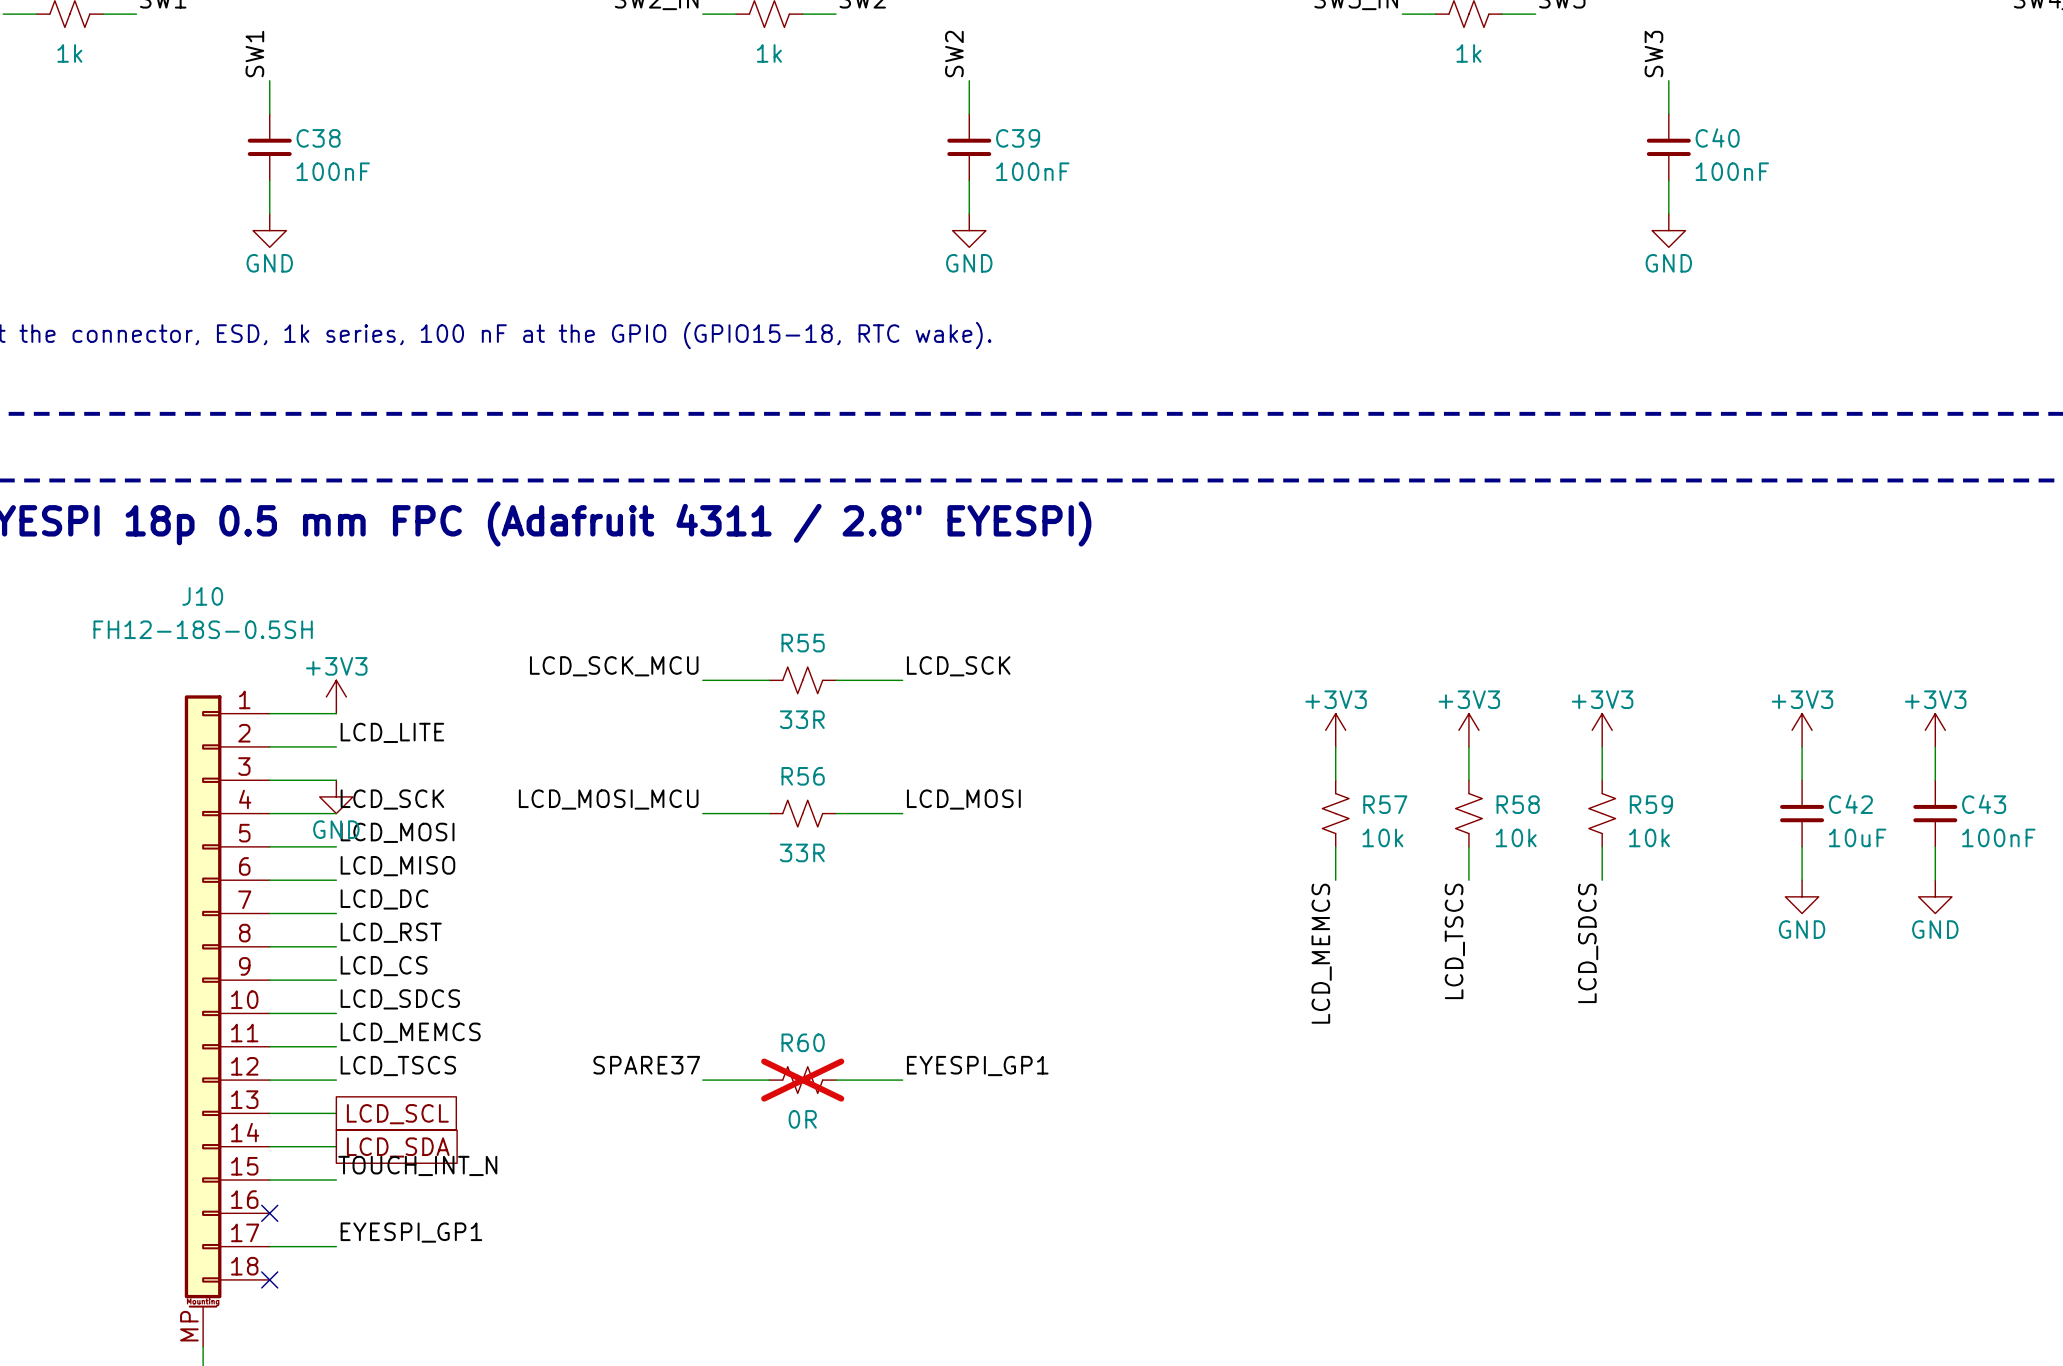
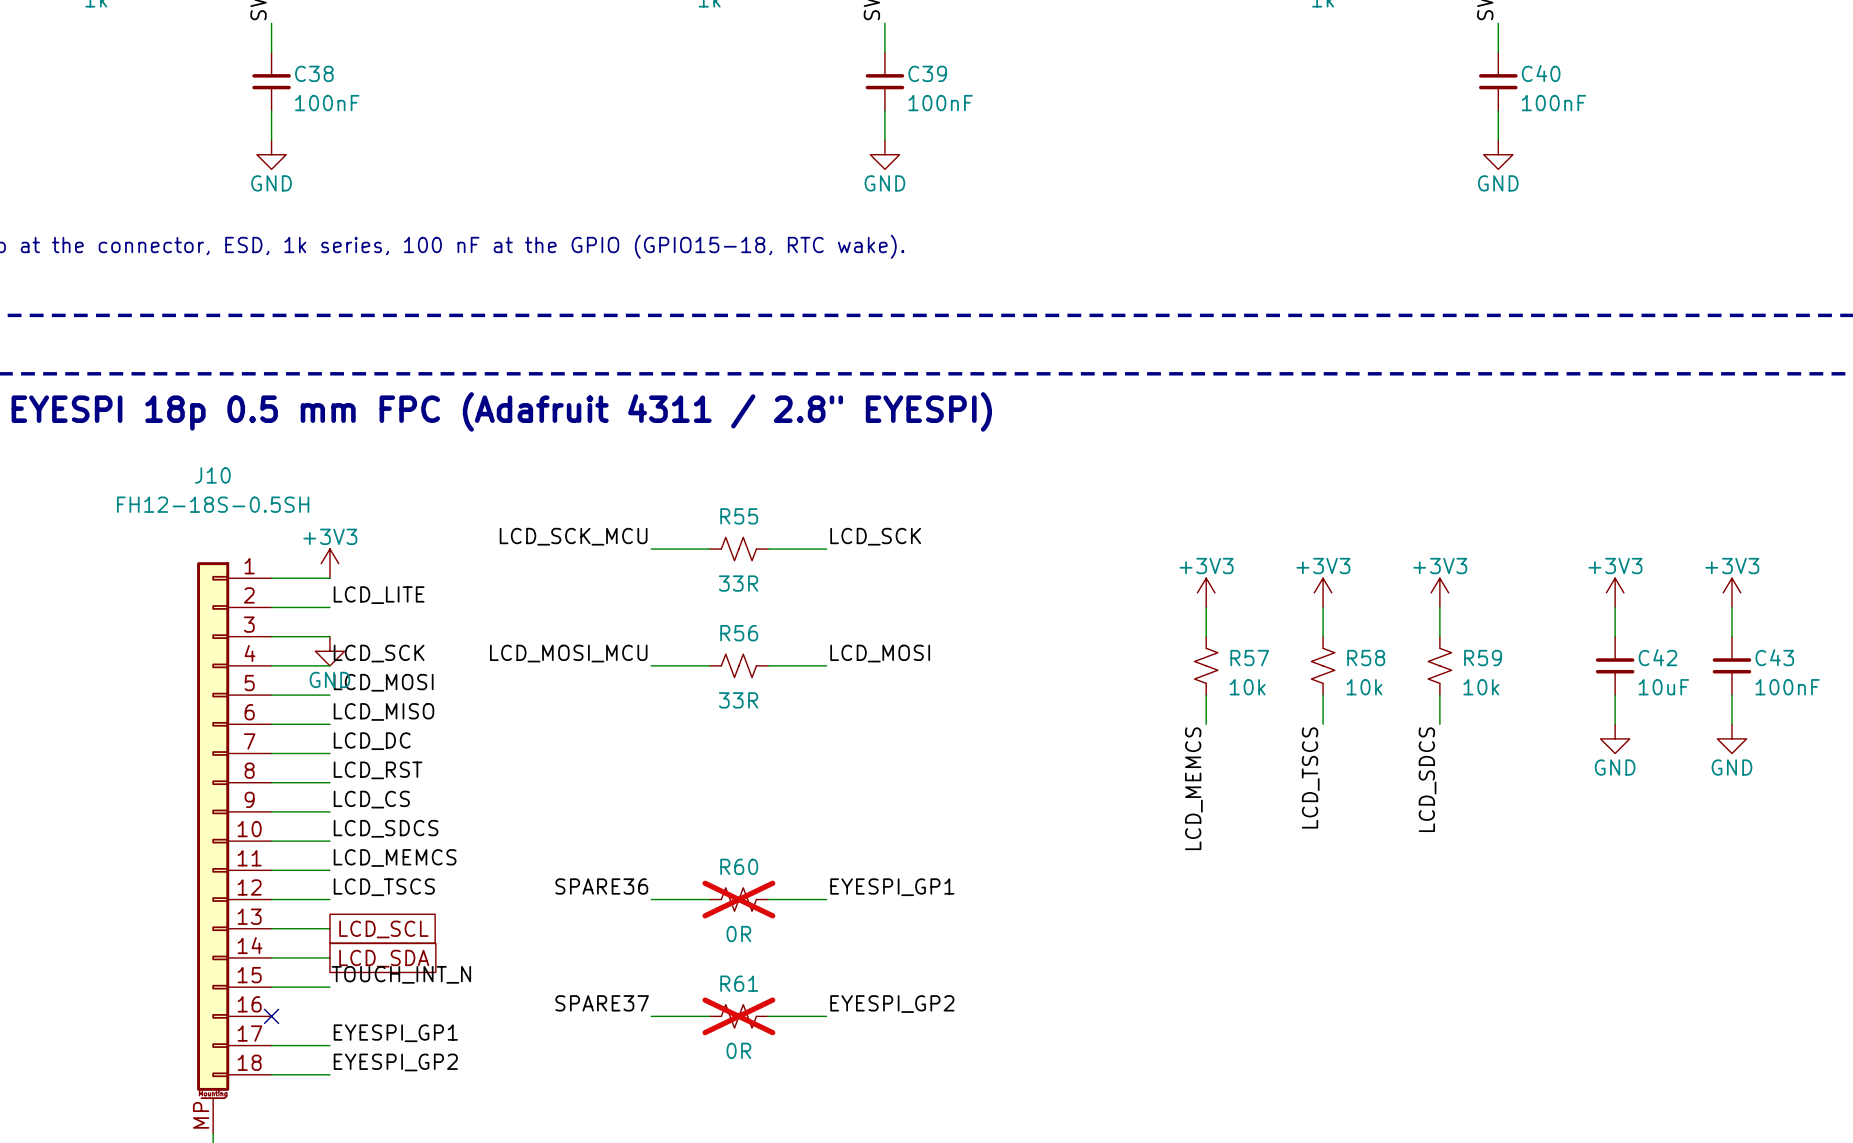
label: SPARE37 (646, 1065) -> SPARE36 (601, 886)
label: none -> SPARE37 (602, 1003)
label: none -> EYESPI_GP2 (892, 1004)
wire: none -> (651, 1016) (709, 1016)
R61: none -> 0R (738, 1016)
wire: none -> (768, 1016) (826, 1016)
label: none -> EYESPI_GP2 (395, 1062)
wire: none -> (271, 1074) (329, 1074)
no-connect mark: (269, 1279) -> none

